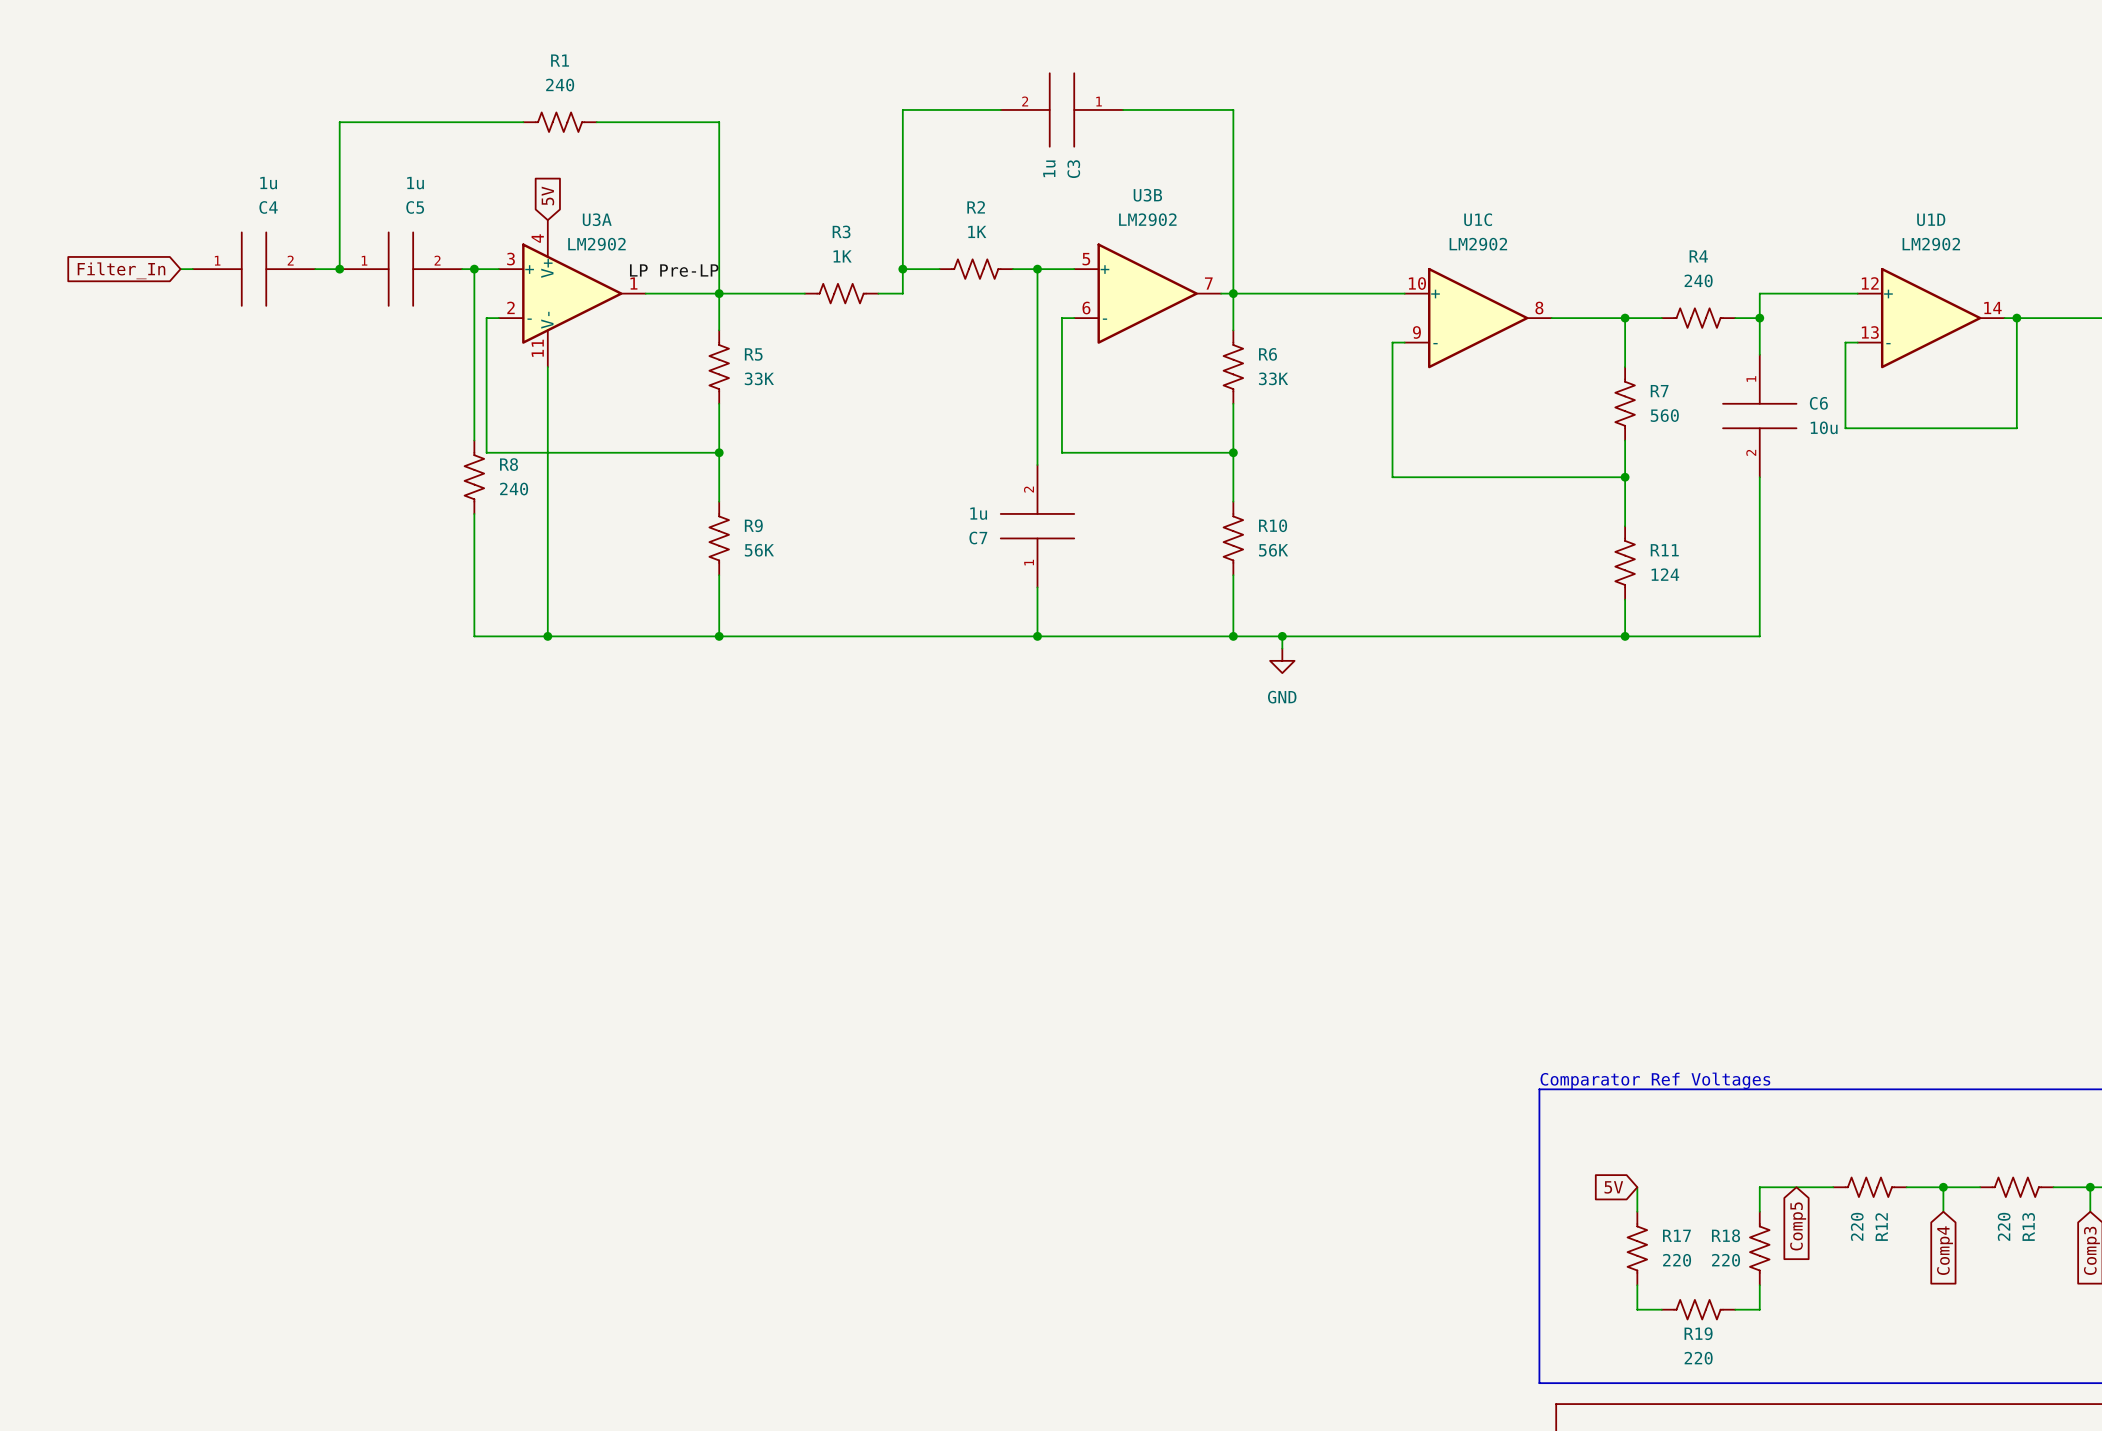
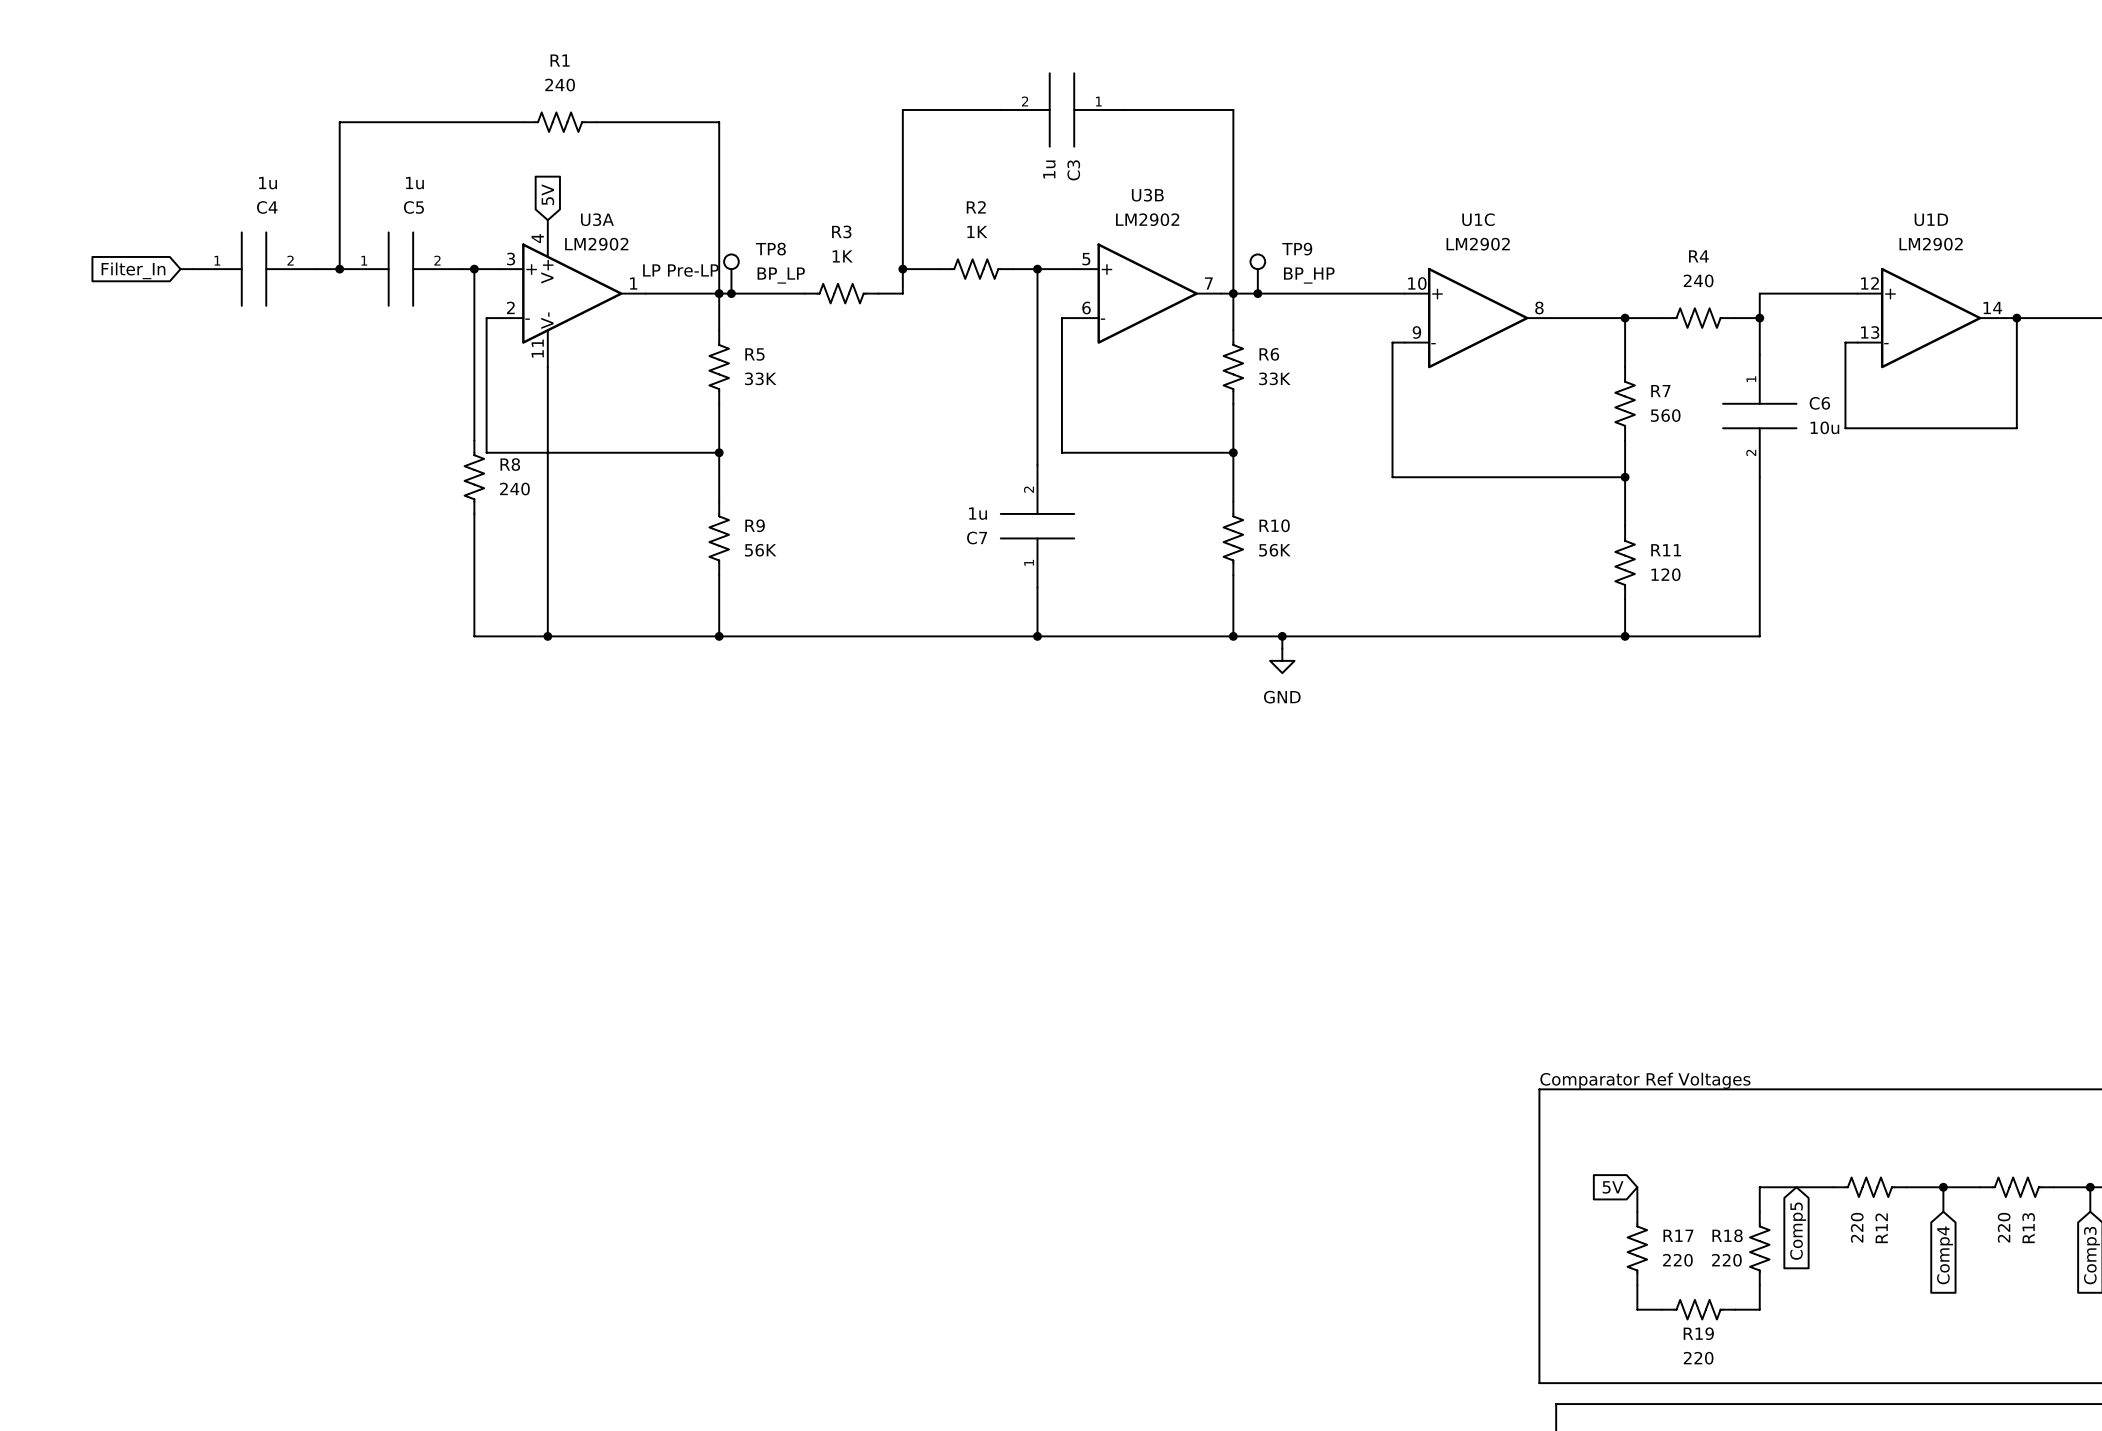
TP8: none -> BP_LP (731, 274)
TP9: none -> BP_HP (1257, 274)
junction: none -> (731, 293)
junction: none -> (1257, 293)
R11 value: 124 (1665, 574) -> 120 (1665, 574)

